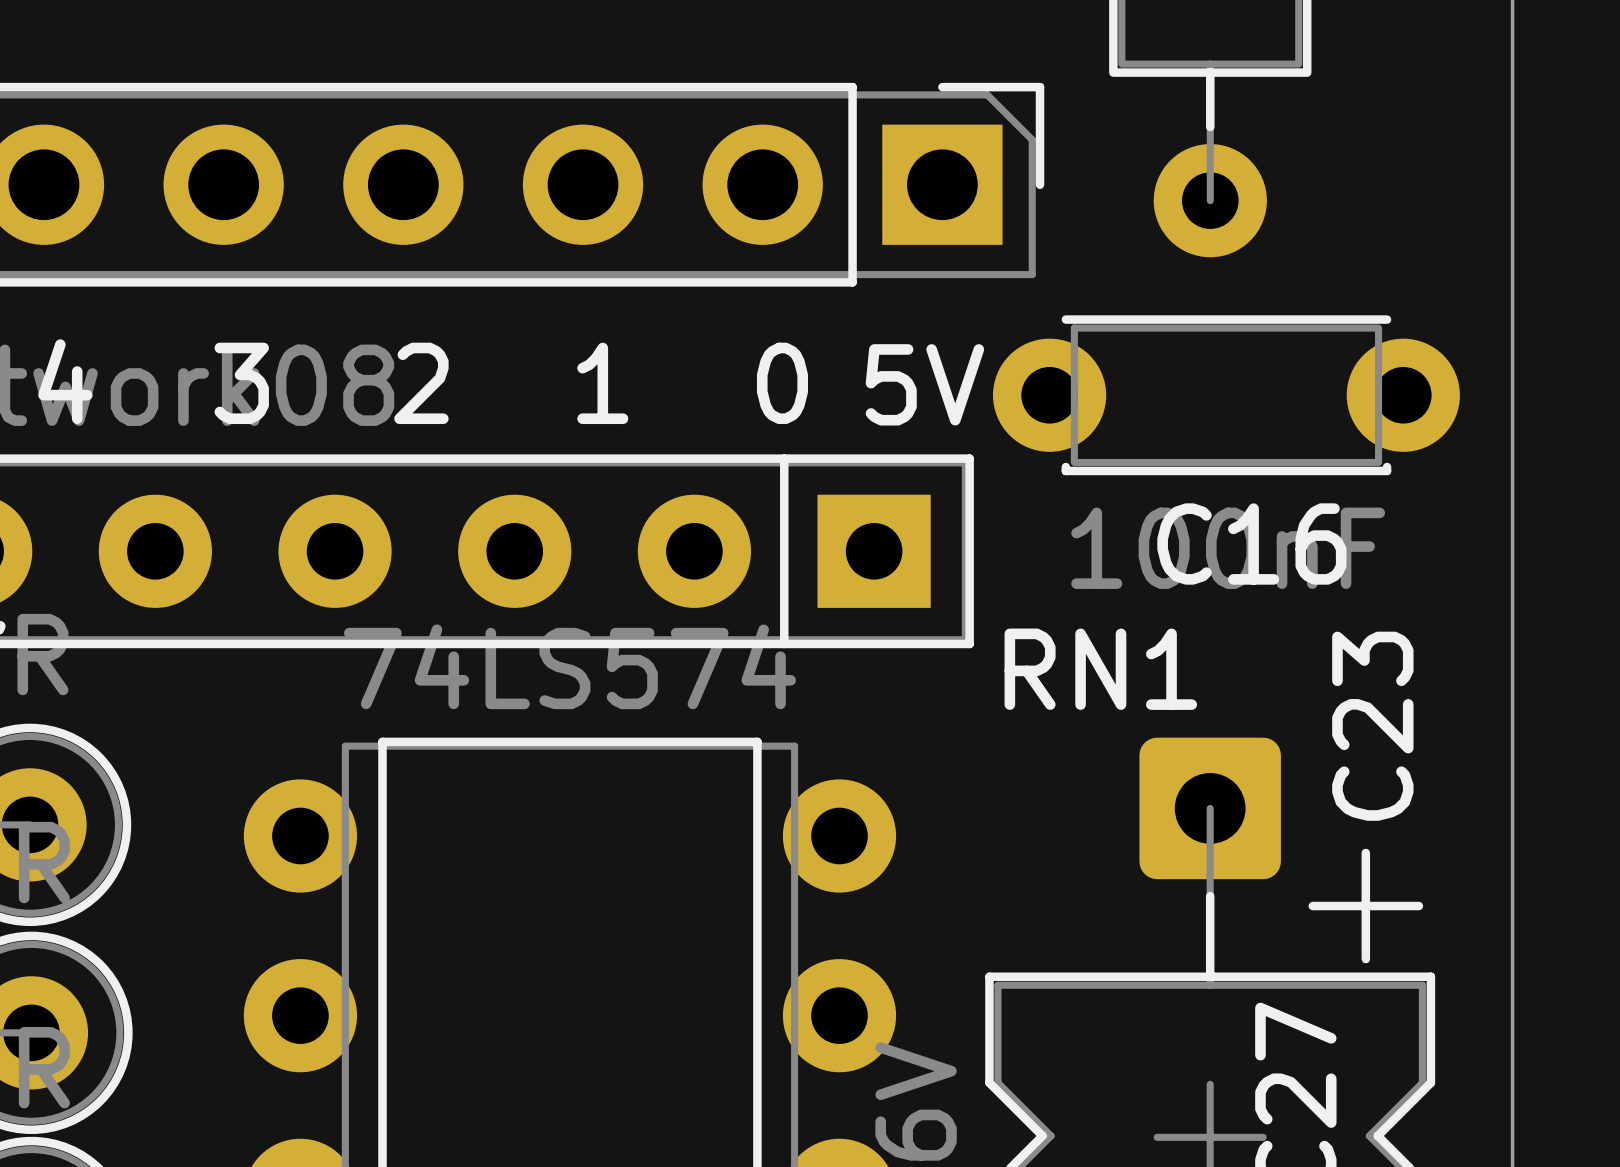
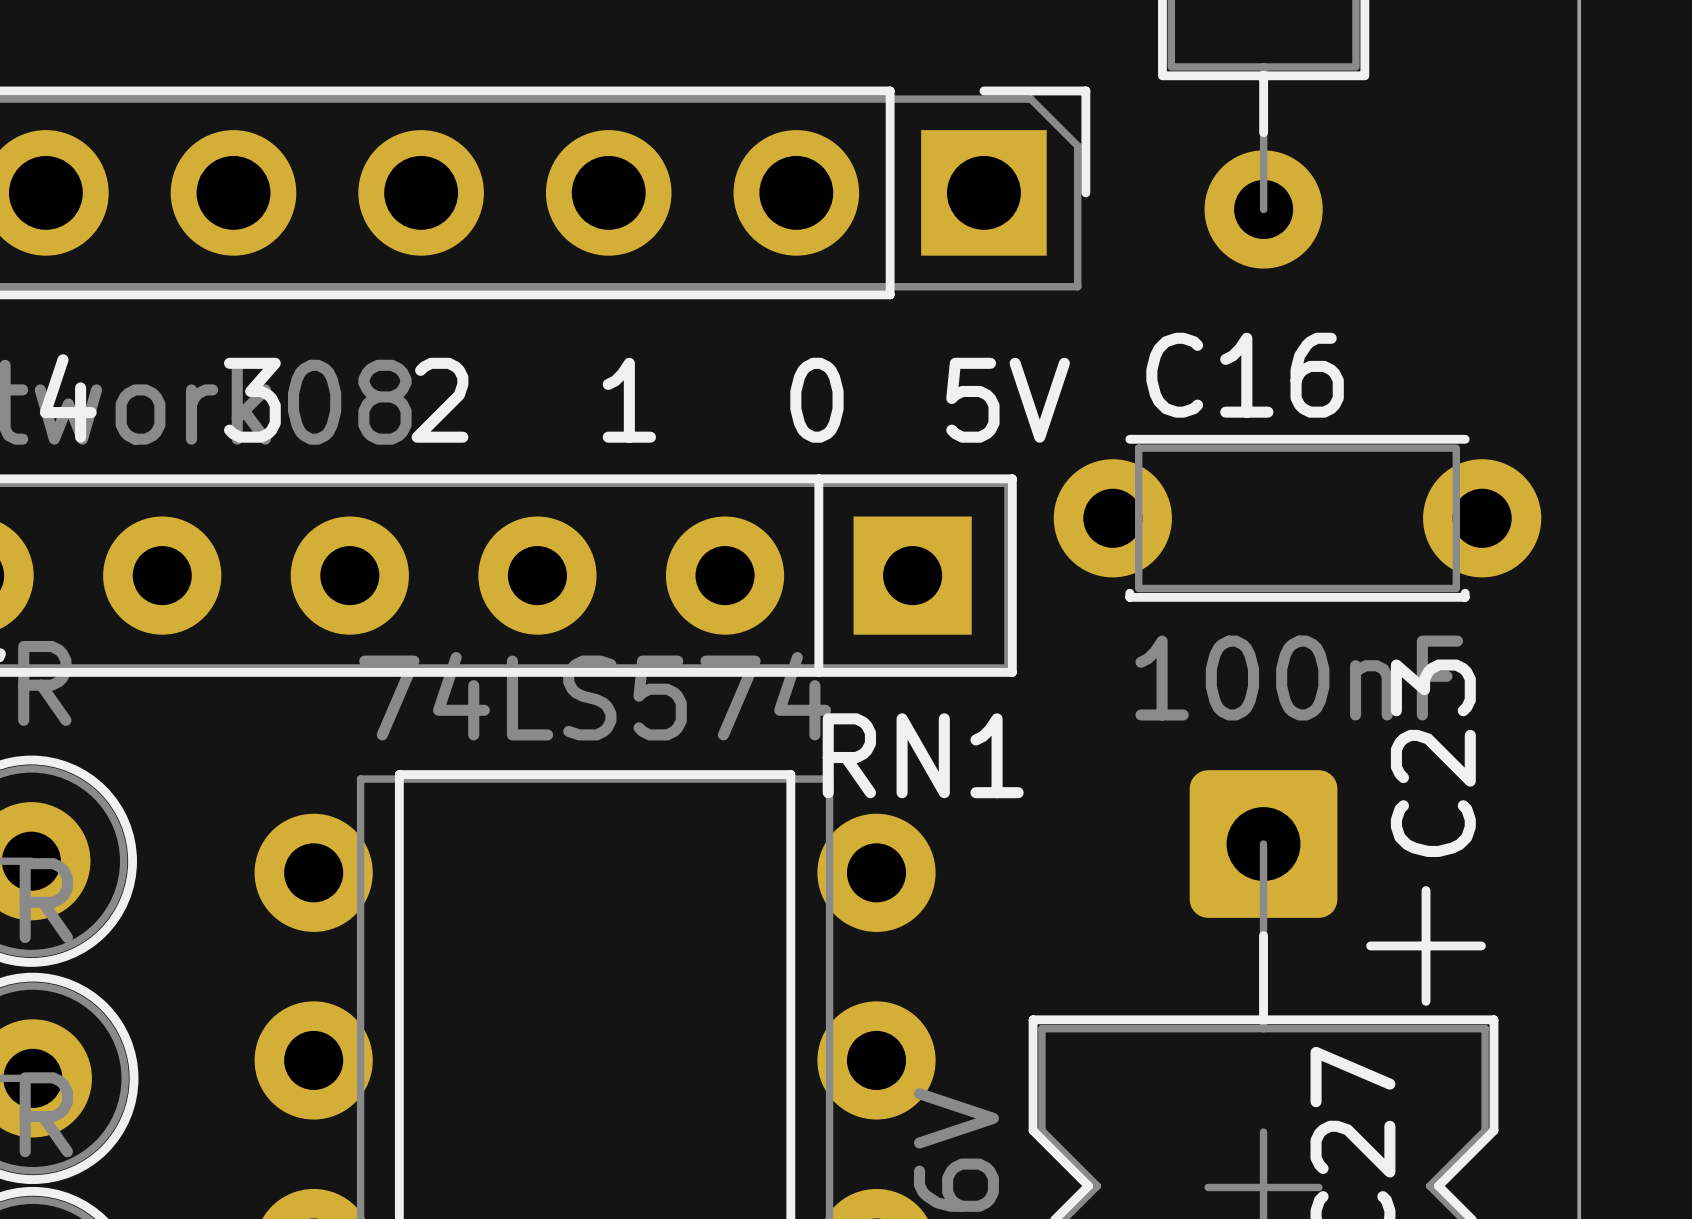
text position: 5V (924, 384) -> 5V (1008, 400)
C16 position: (1226, 395) -> (1297, 518)
C16 name position: C16 (1251, 544) -> C16 (1245, 375)
RN1 name position: RN1 (1100, 669) -> RN1 (923, 755)

